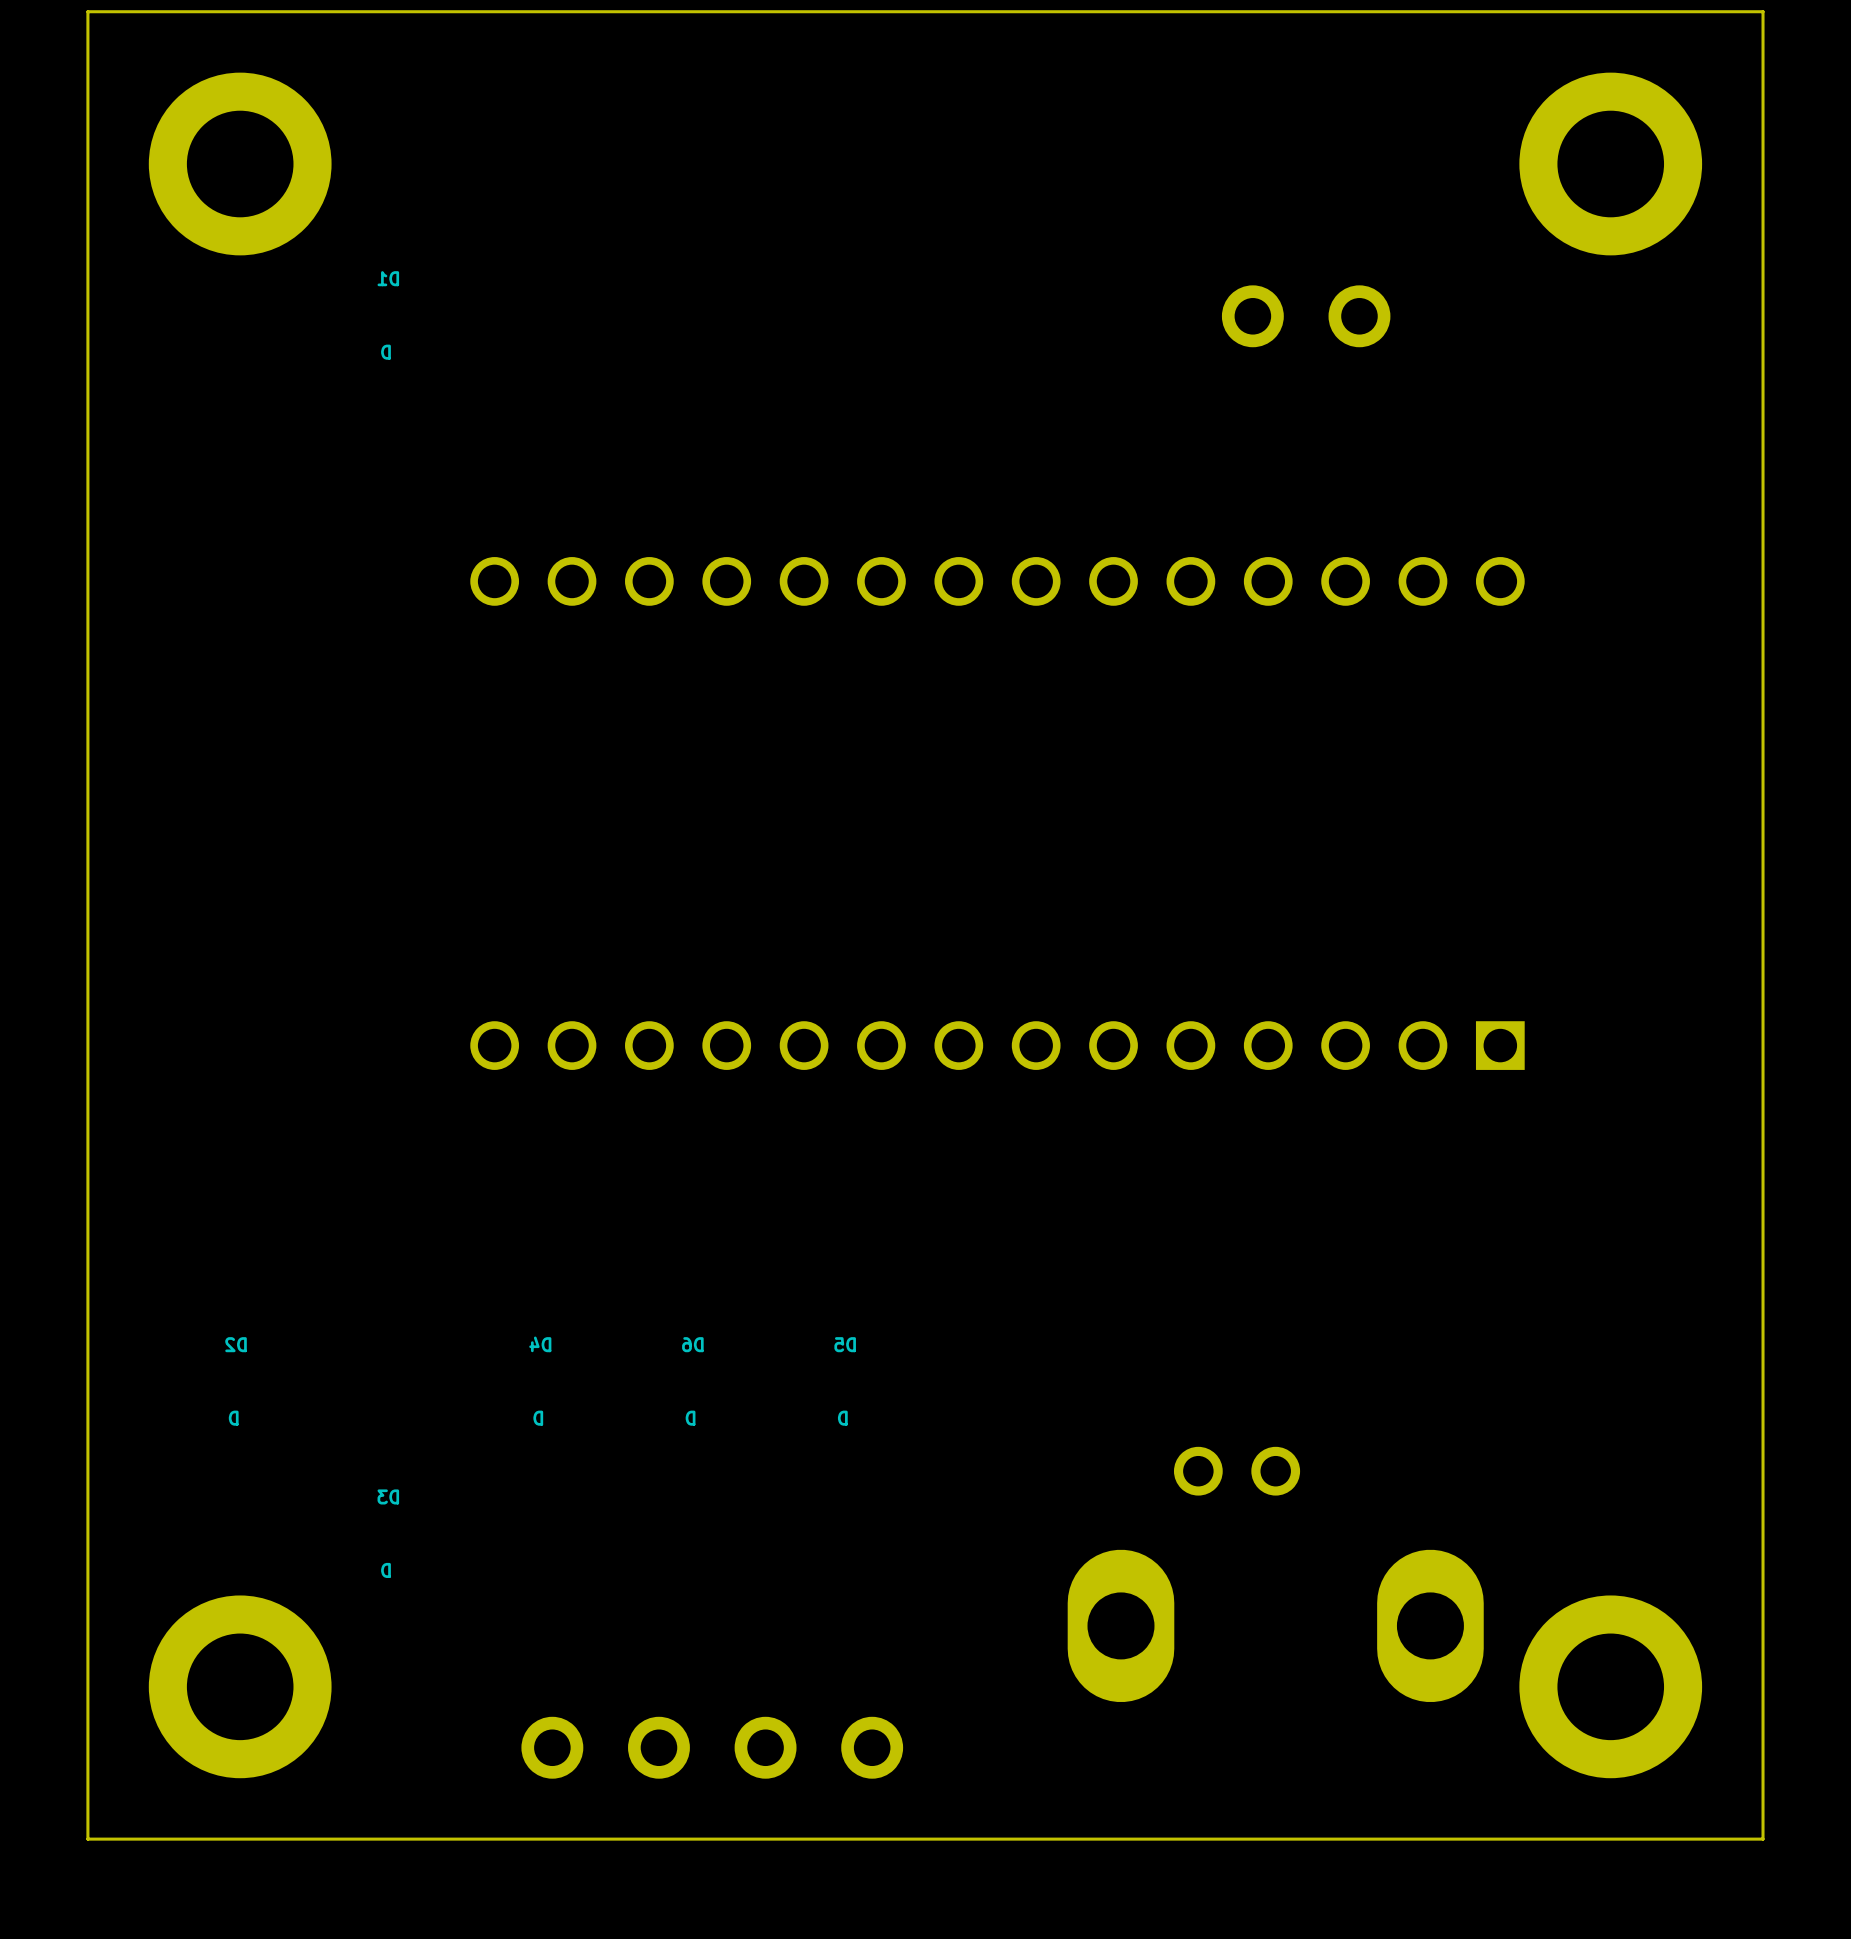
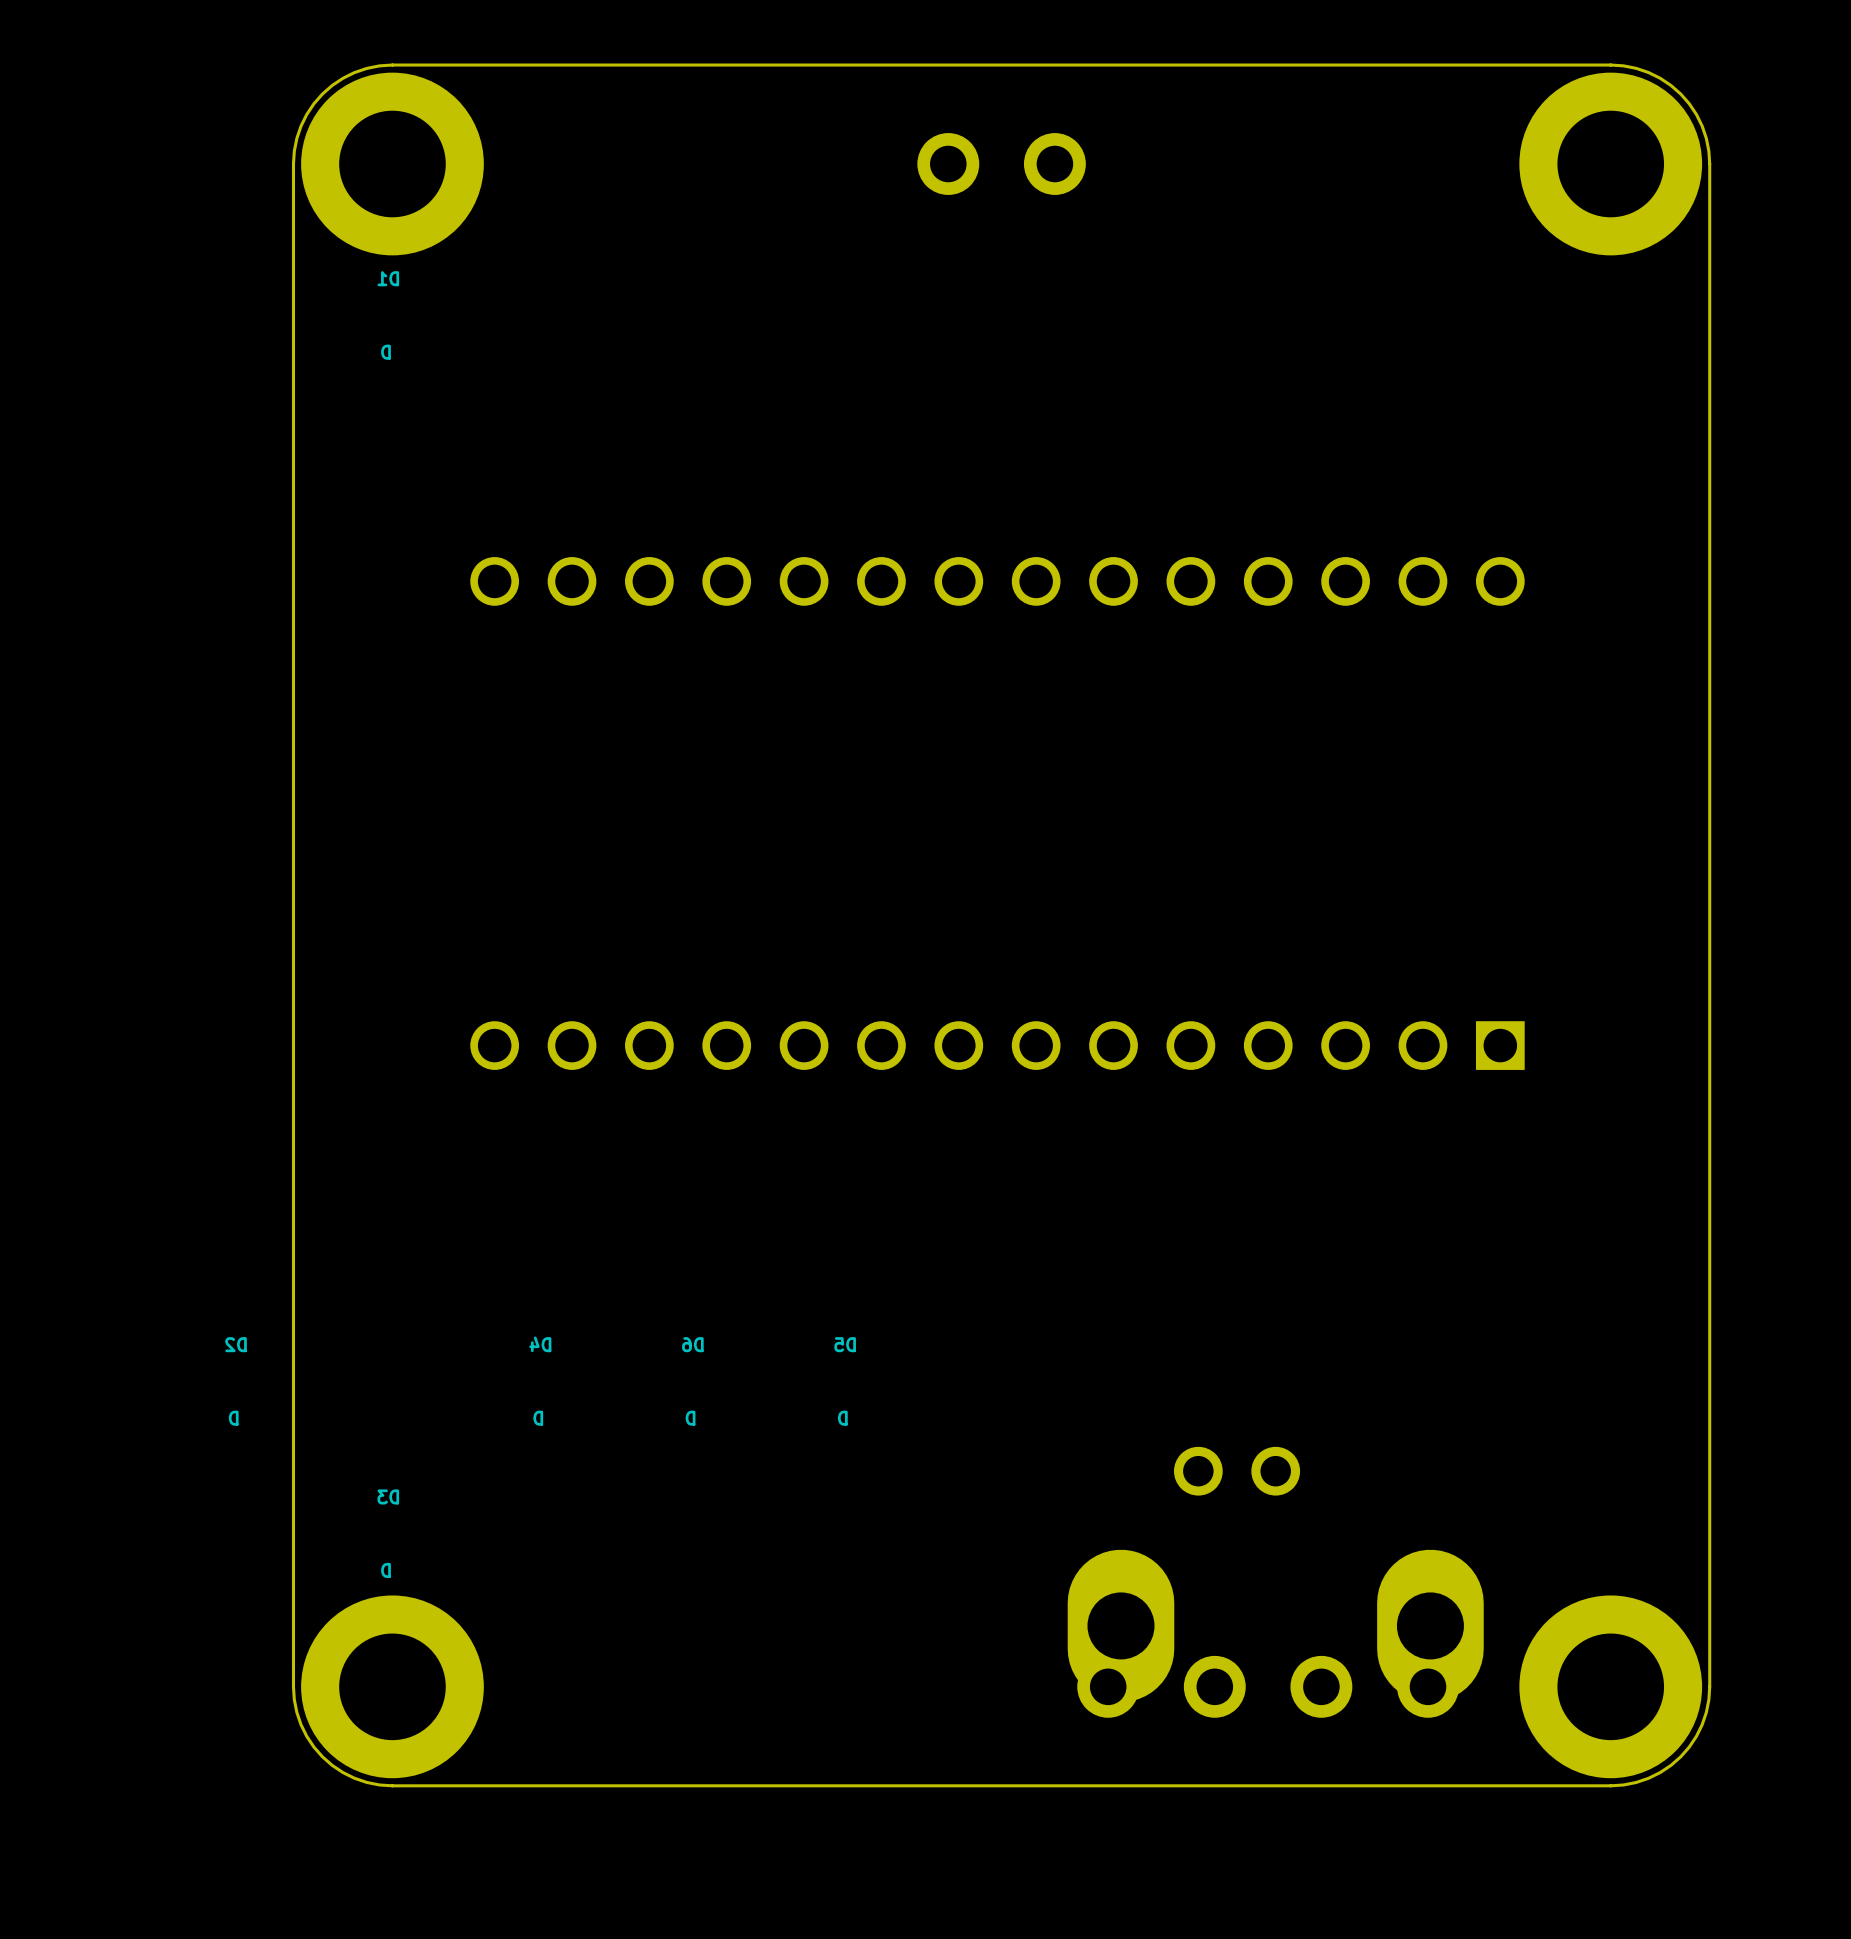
board edge: (1763, 11) (1763, 1839) (87, 1839) (87, 11) (1763, 11) -> (1610, 65) (1623, 65) (1648, 72) (1660, 78) (1680, 94) (1696, 114) (1702, 126) (1708, 151) (1709, 164) (1709, 1686) (1708, 1699) (1702, 1724) (1689, 1747) (1670, 1765) (1660, 1772) (1636, 1782) (1610, 1785) (392, 1785) (366, 1782) (354, 1778) (332, 1765) (322, 1756) (306, 1736) (296, 1712) (293, 1686) (293, 164) (296, 138) (301, 126) (313, 103) (322, 94) (342, 78) (366, 68) (392, 65) (1610, 65)
part position: (240, 164) -> (392, 164)
part position: (1306, 316) -> (1001, 164)
part position: (240, 1686) -> (392, 1686)
part: none -> (1161, 1686)
part: none -> (1374, 1686)
part: (605, 1747) -> none
part: (818, 1747) -> none

